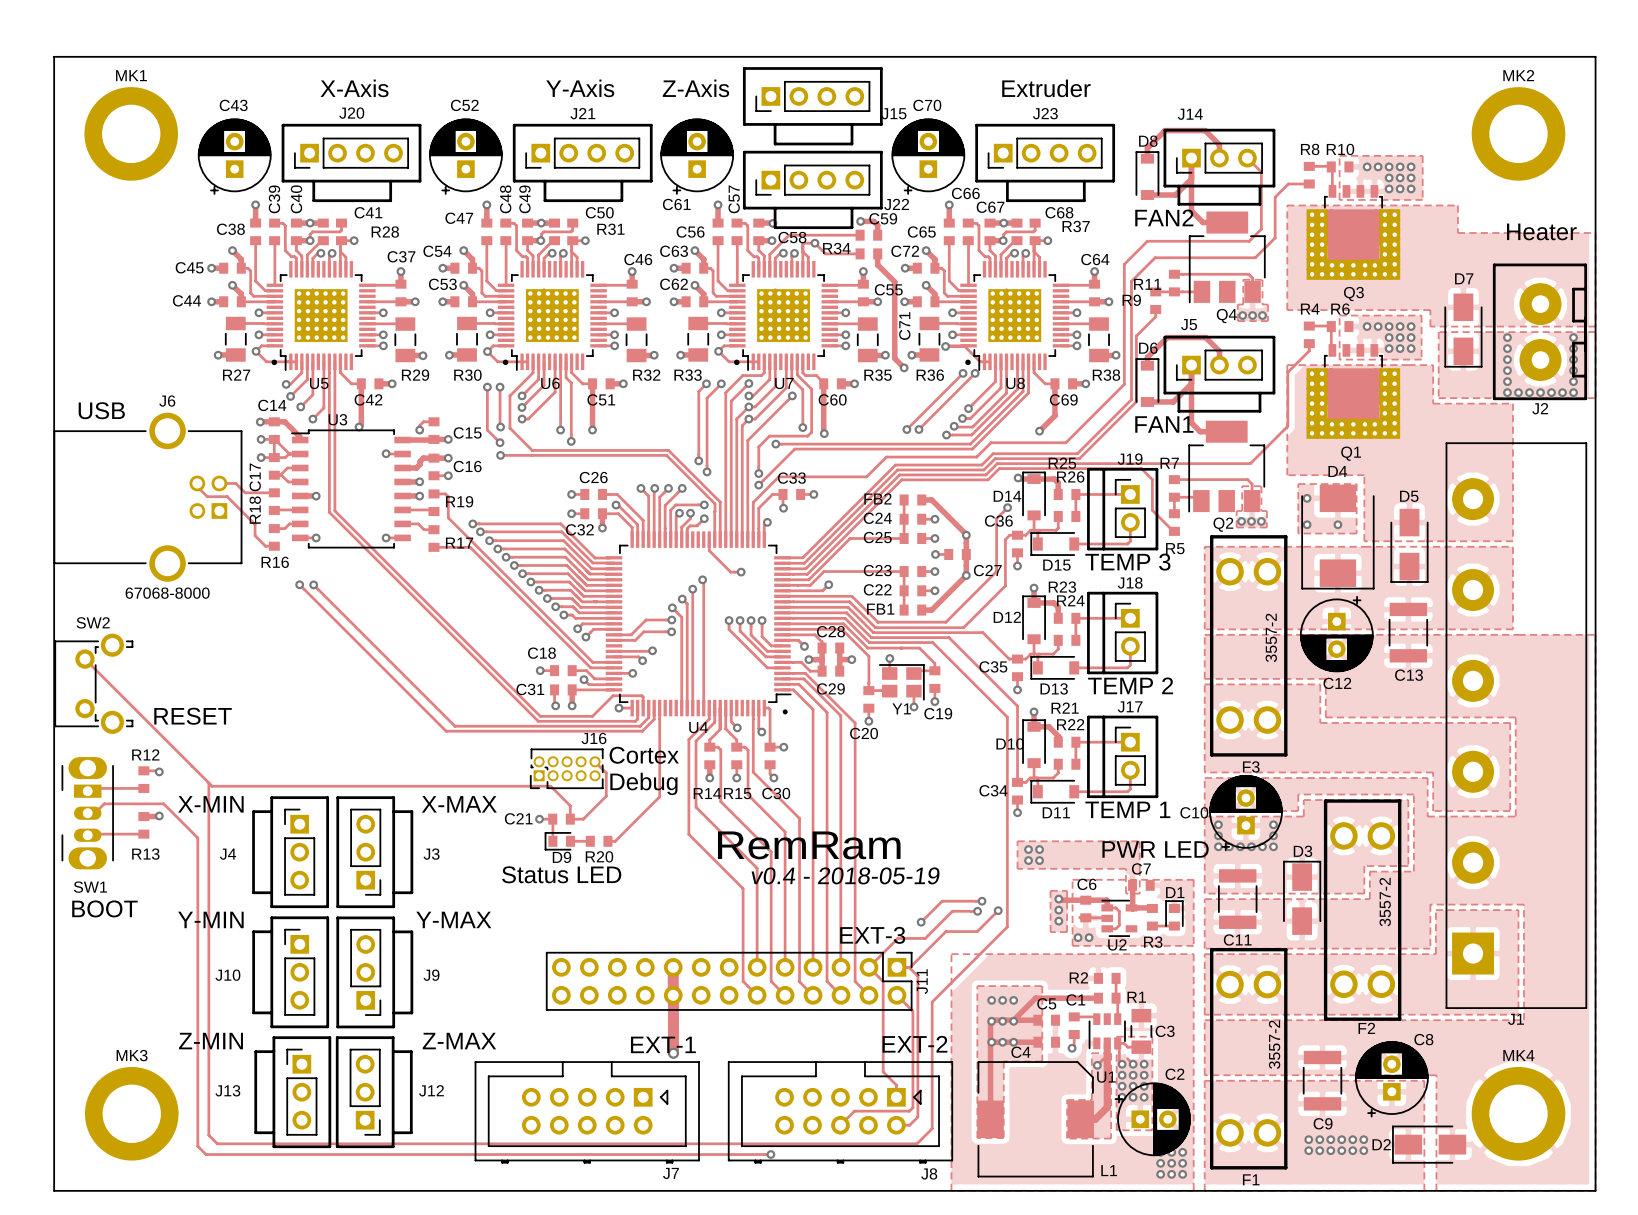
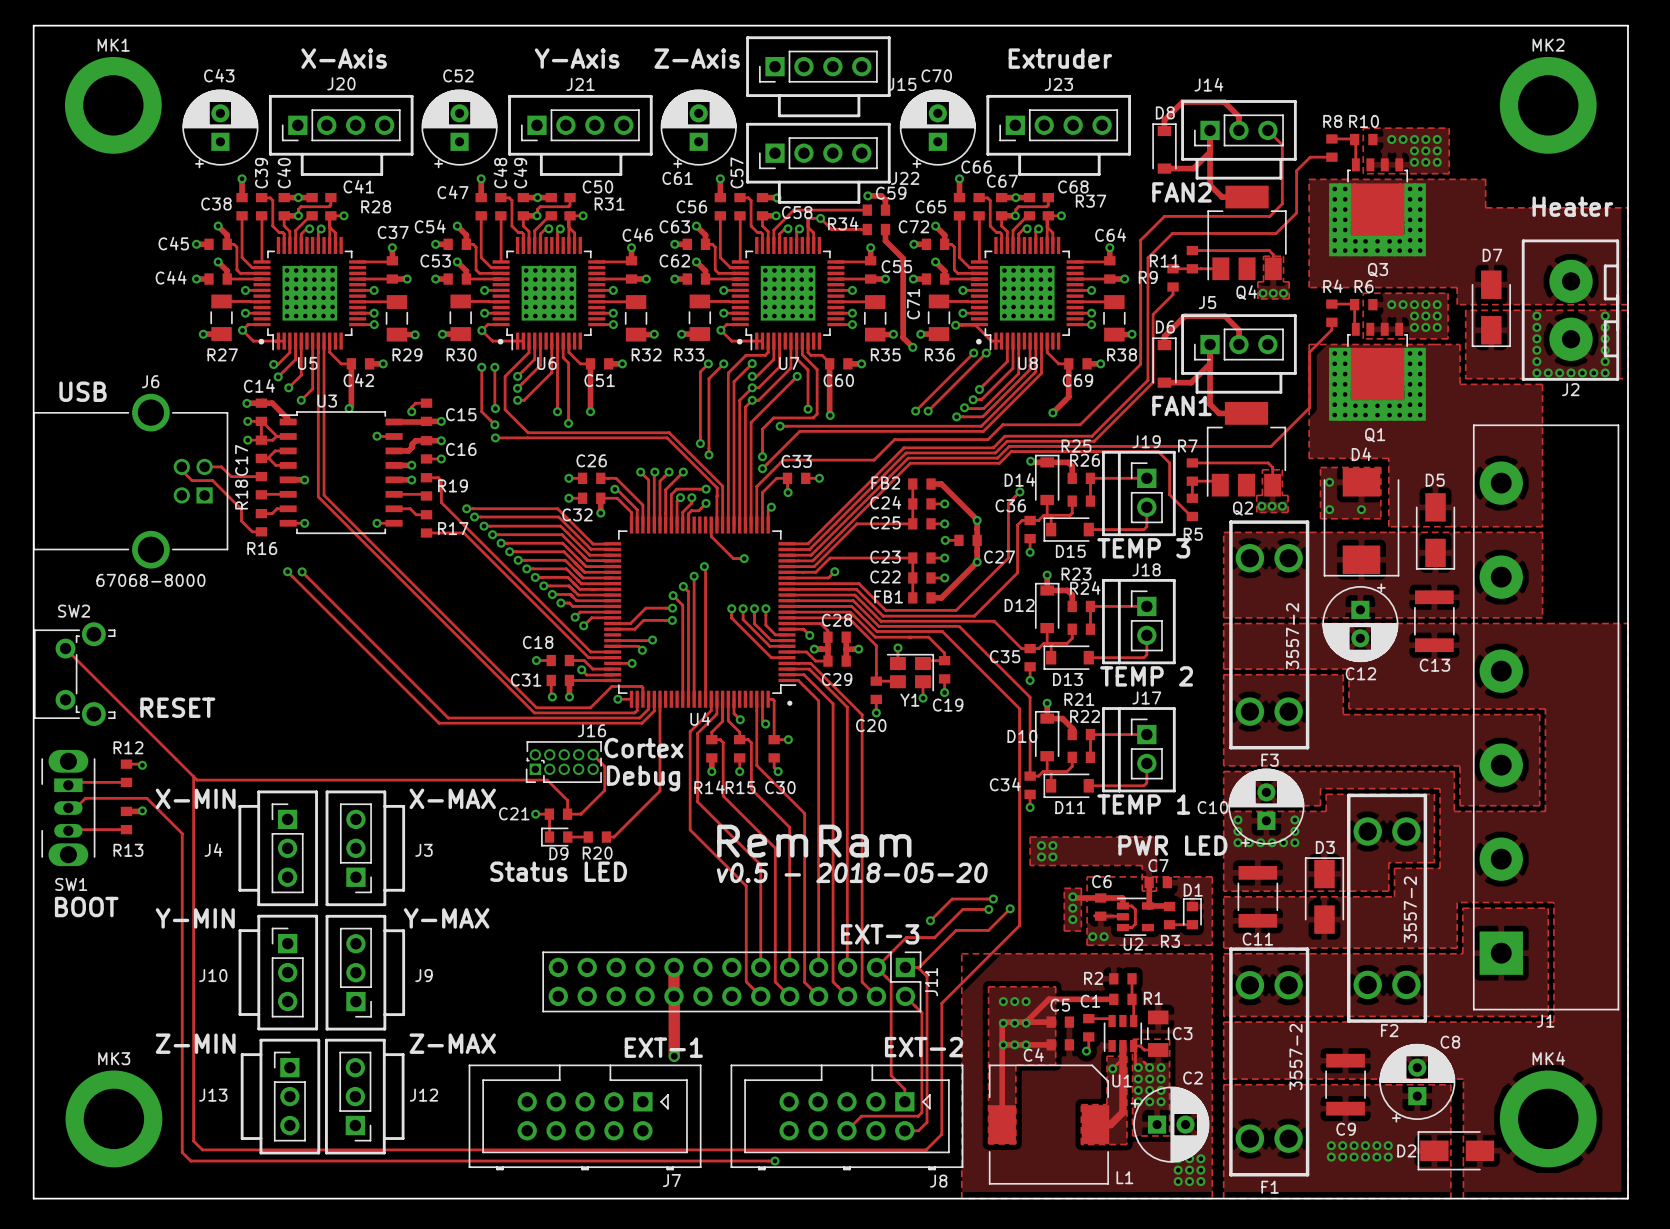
text: v0.4 - 2018-05-19 (845, 875) -> v0.5 - 2018-05-20 (852, 872)

